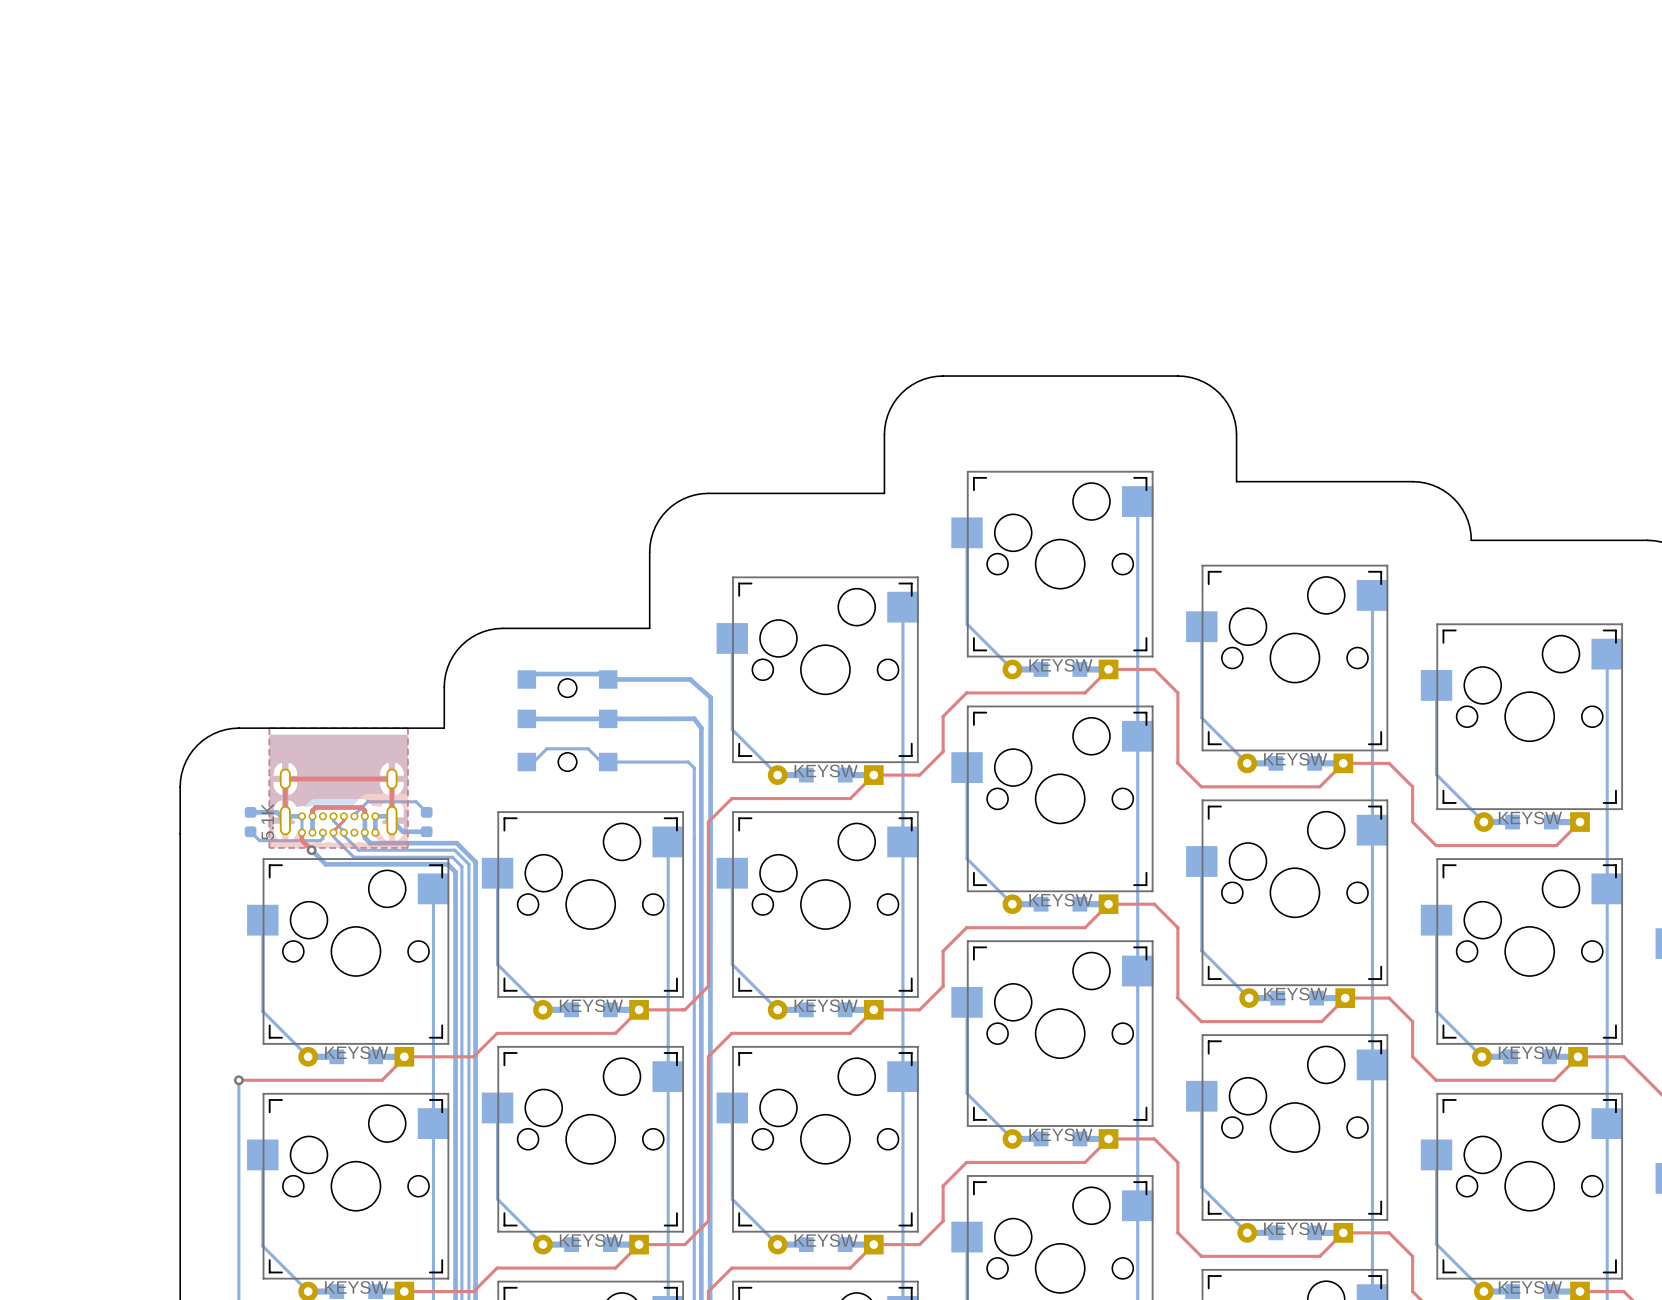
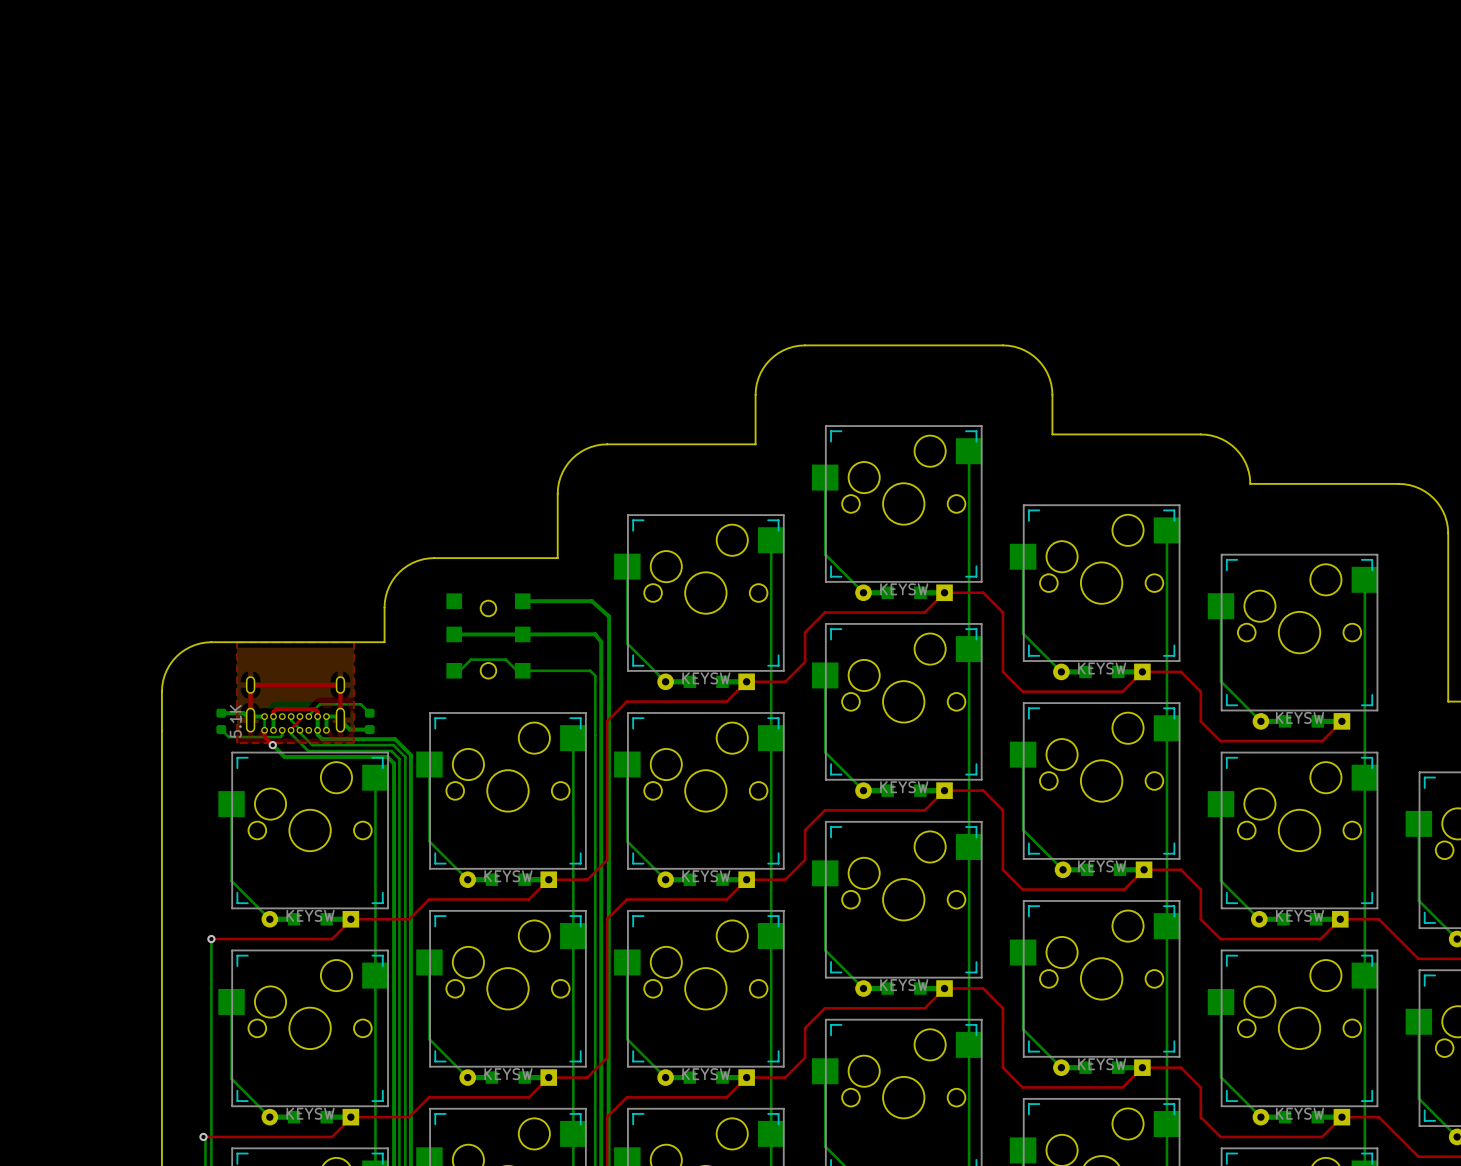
bottom track: (526, 679) (532, 674) (602, 674) (608, 679) -> none

